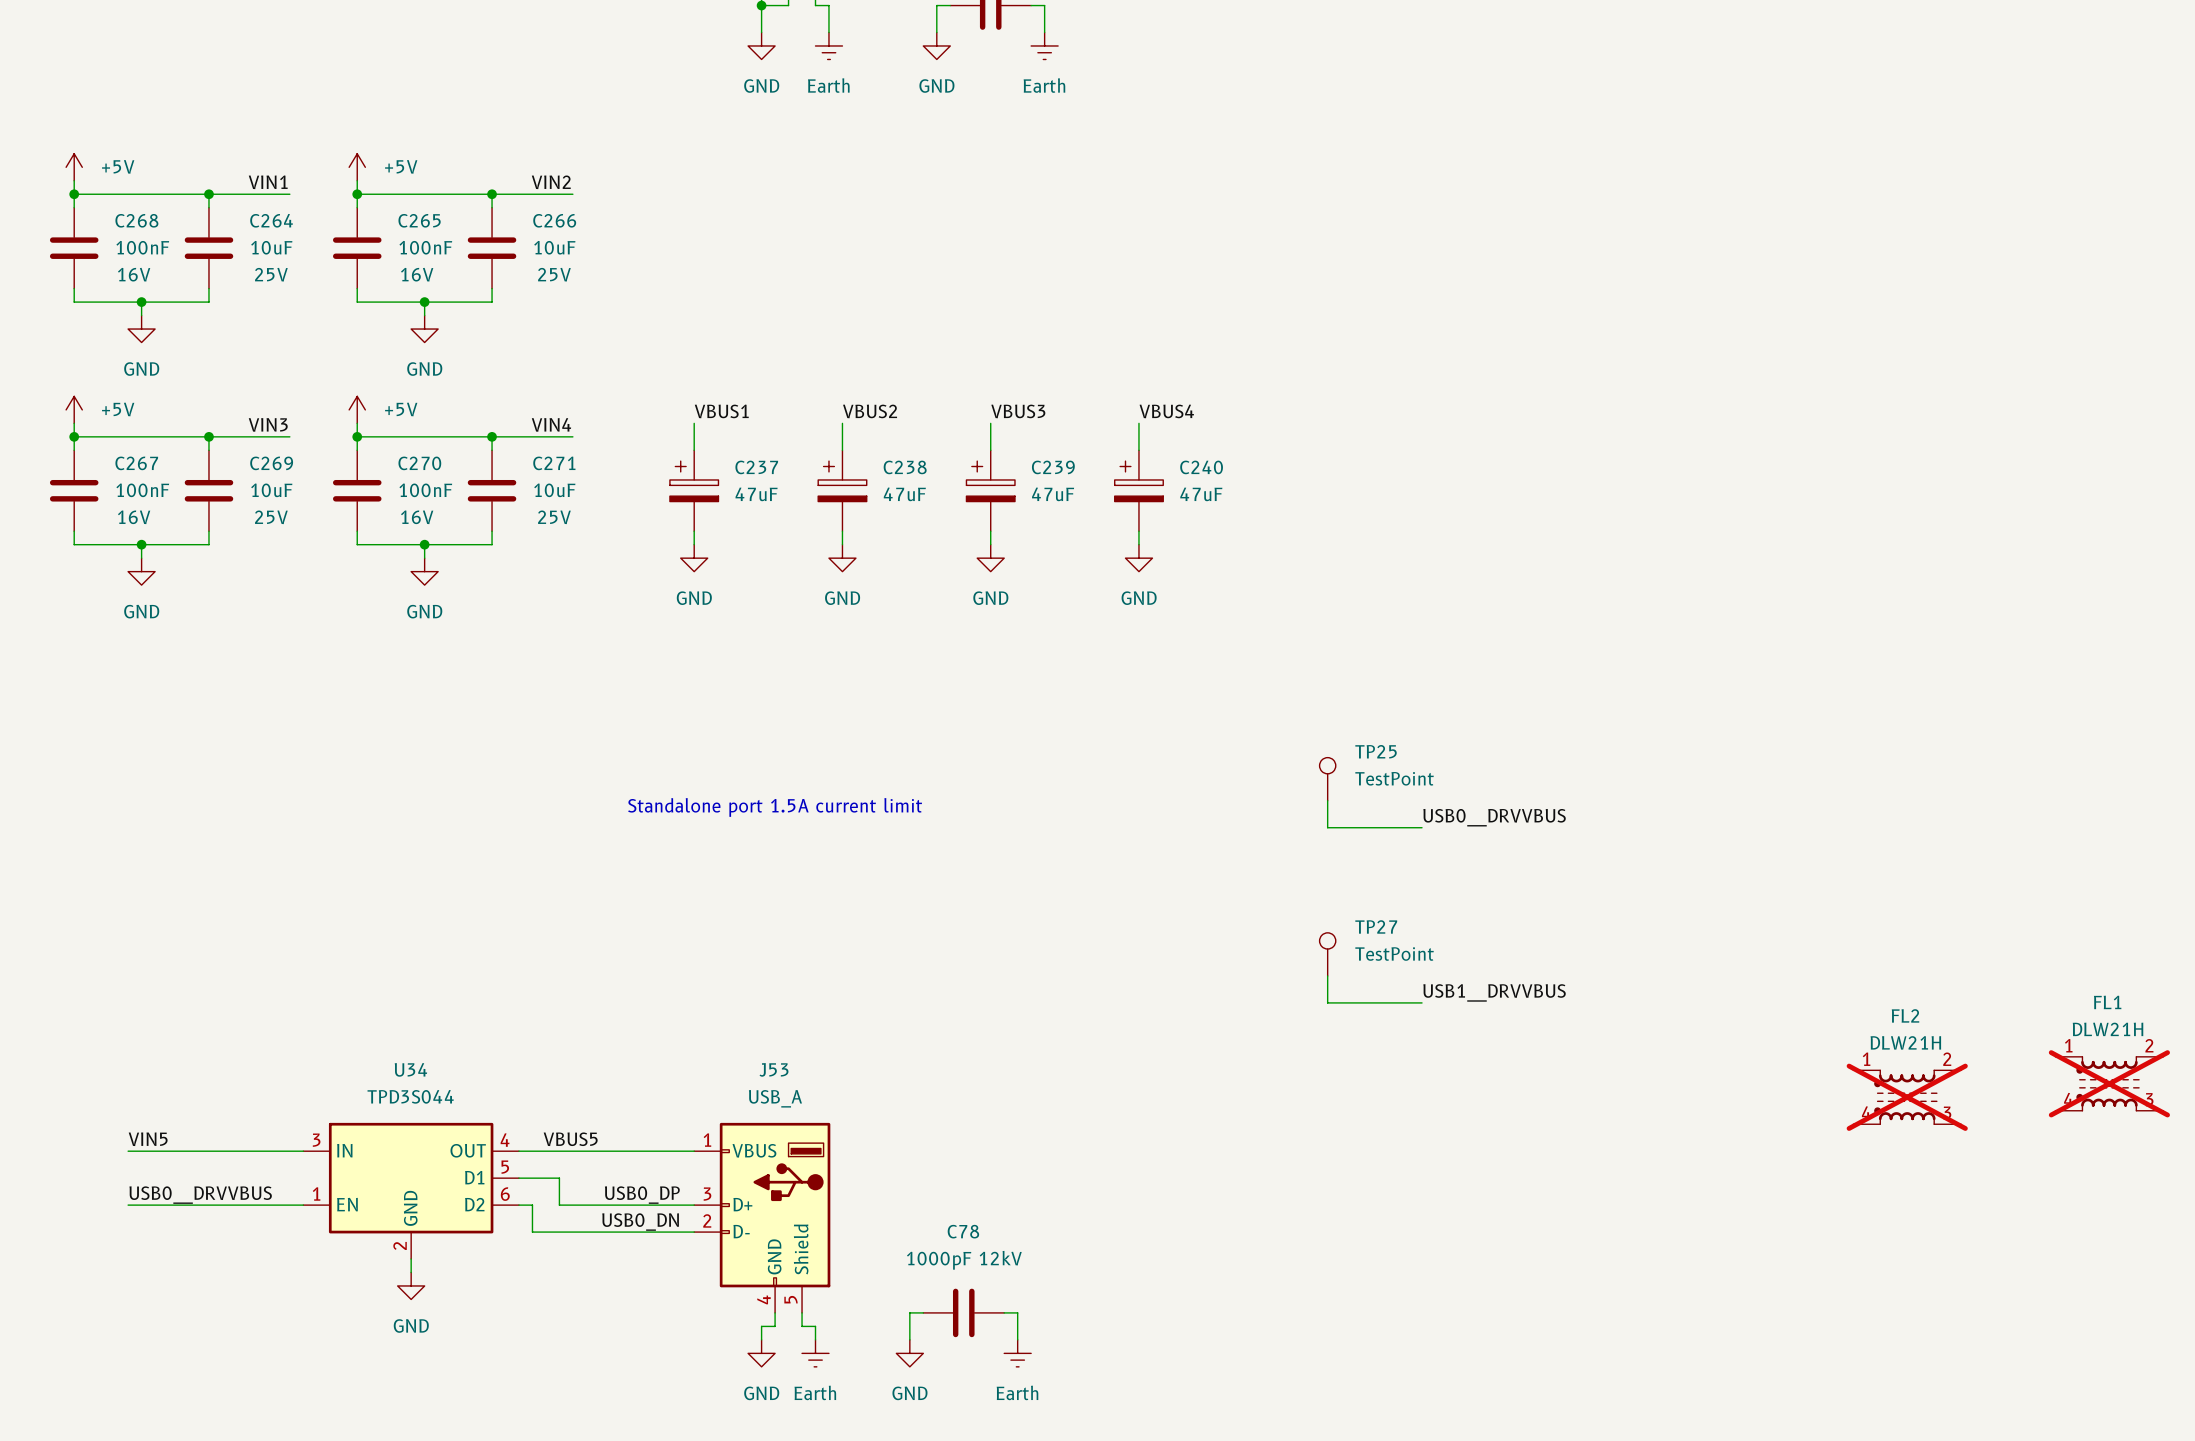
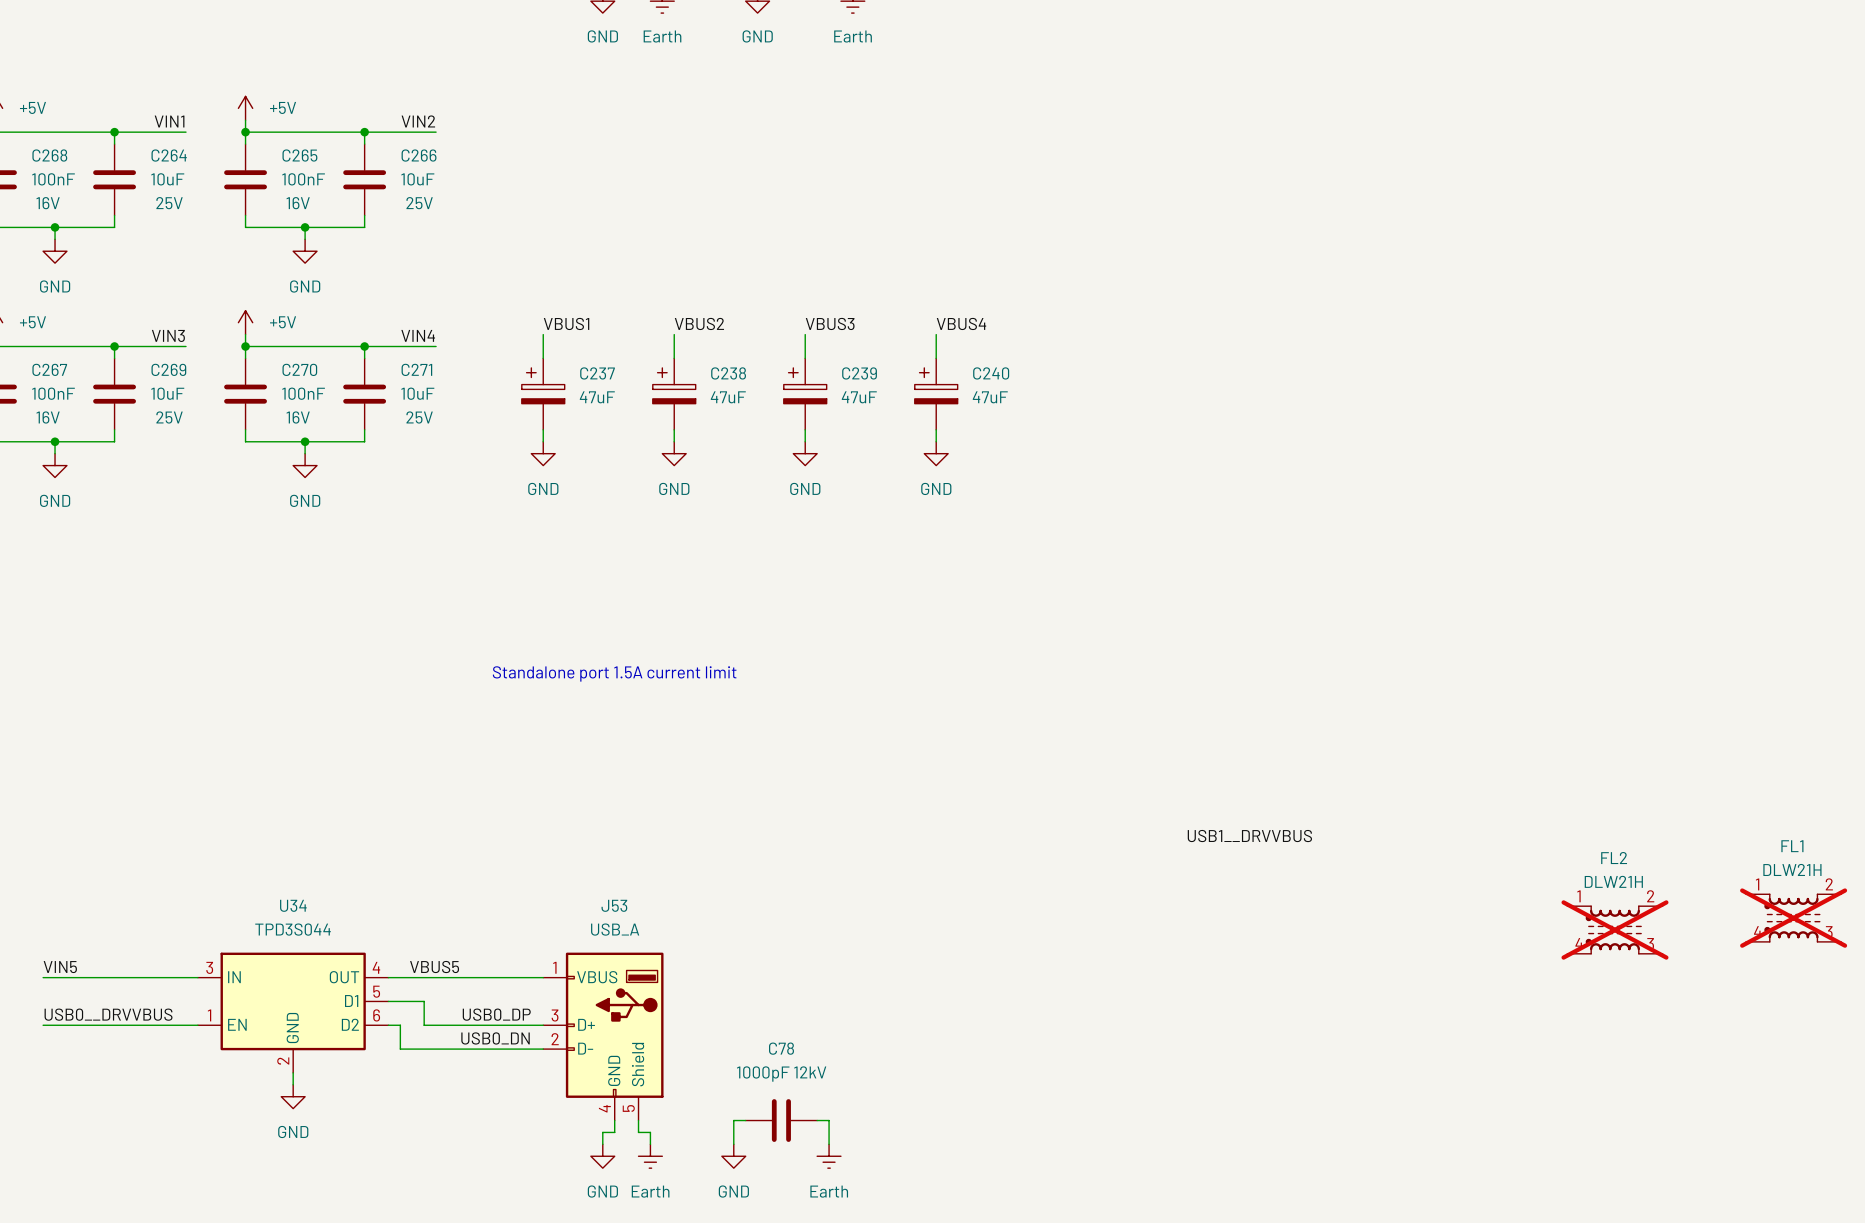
TP25: TestPoint (1327, 779) -> none
wire: (1327, 800) (1327, 827) (1422, 827) -> none
label: USB0__DRVVBUS (1494, 817) -> none
TP27: TestPoint (1327, 954) -> none
wire: (1327, 975) (1327, 1002) (1422, 1002) -> none

